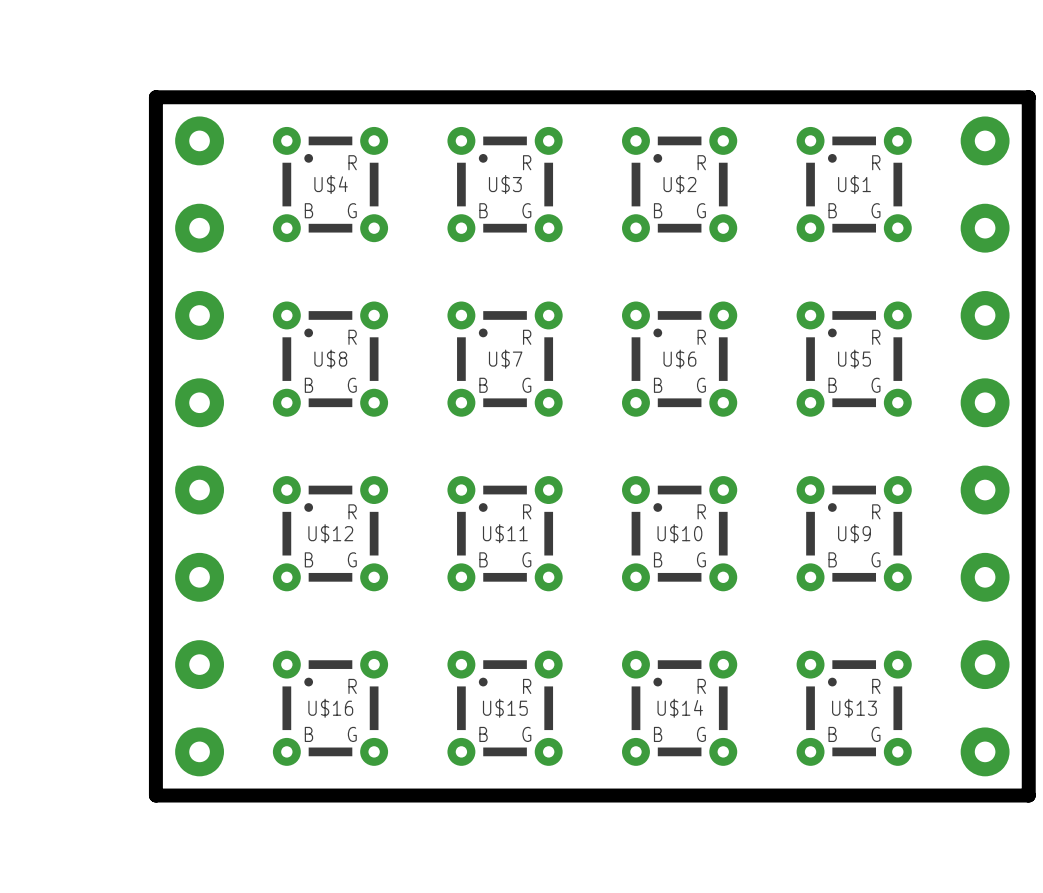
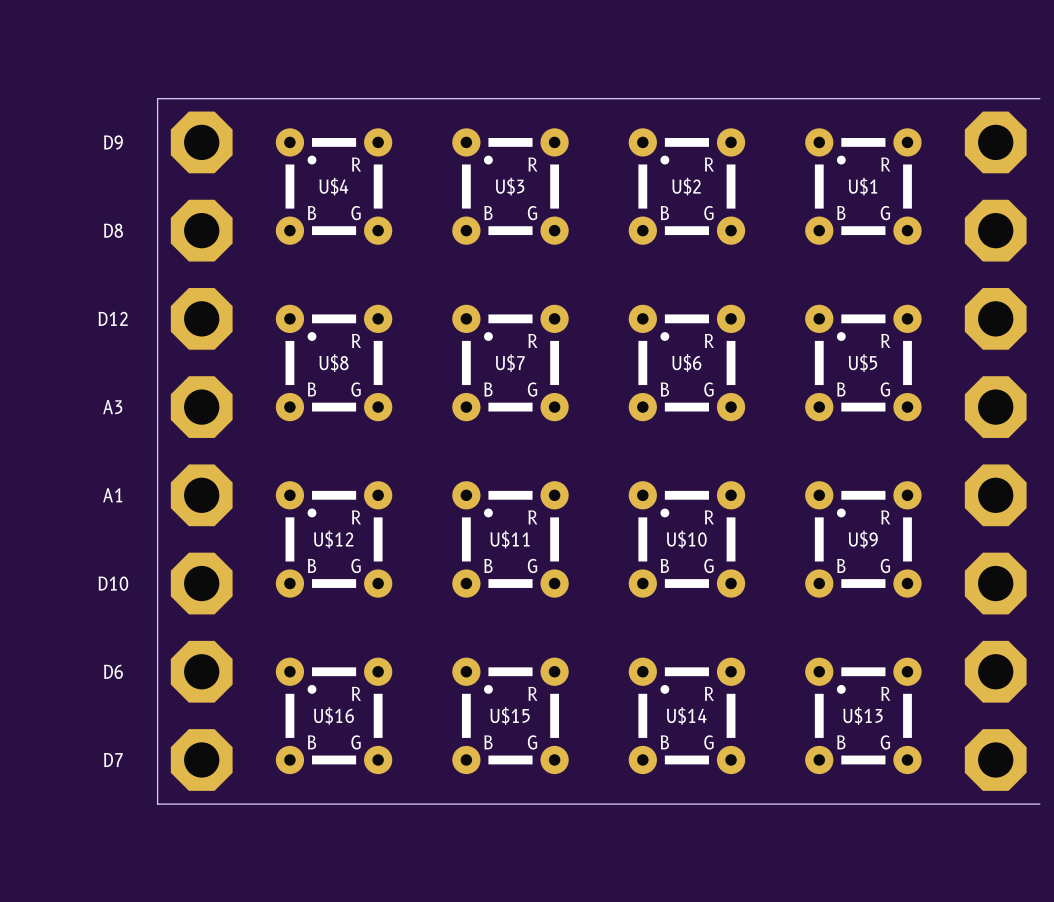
board edge: (155, 97) (1028, 97) (1028, 795) -> (157, 98) (1039, 98)
board edge width: thick (155, 97) (155, 795) (1028, 795) -> thin (157, 98) (157, 804) (1039, 804)
part footprint: [175, 116, 225, 777] -> [170, 111, 233, 791]
part footprint: [960, 116, 1010, 777] -> [964, 111, 1027, 791]
text: none -> D9 (113, 142)
text: none -> D8 (113, 230)
text: none -> D12 (113, 318)
text: none -> A3 (112, 407)
text: none -> A1 (112, 495)
text: none -> D10 (113, 583)
text: none -> D6 (113, 671)
text: none -> D7 (113, 760)

